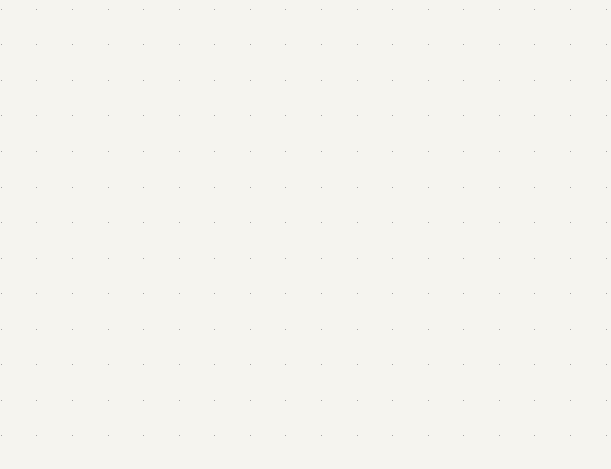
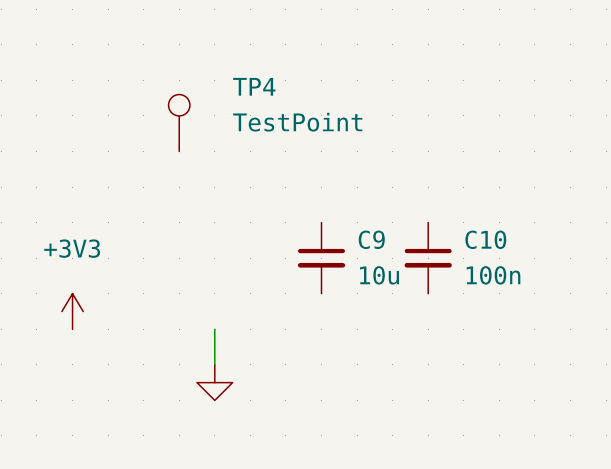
TP4: none -> TestPoint (179, 123)
C9: none -> 10u (321, 258)
C10: none -> 100n (428, 258)
power symbol: none -> +3V3 (72, 311)
wire: none -> (214, 329) (214, 364)
power symbol: none -> (214, 382)

